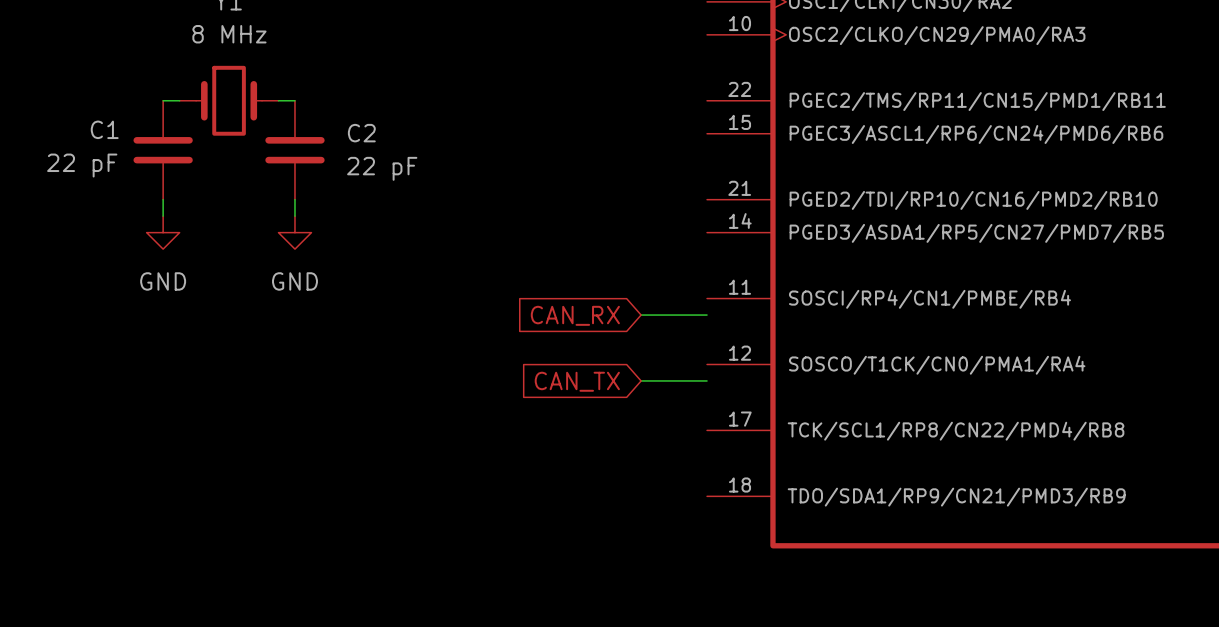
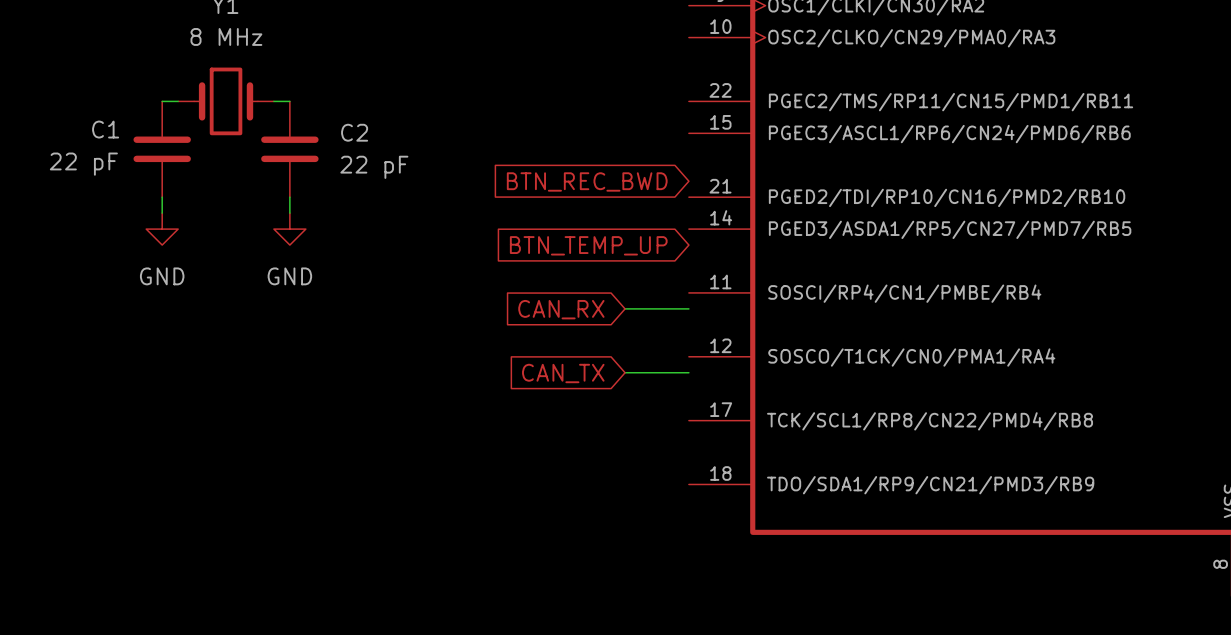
global label: none -> BTN_REC_BWD (587, 181)
global label: none -> BTN_TEMP_UP (588, 245)

